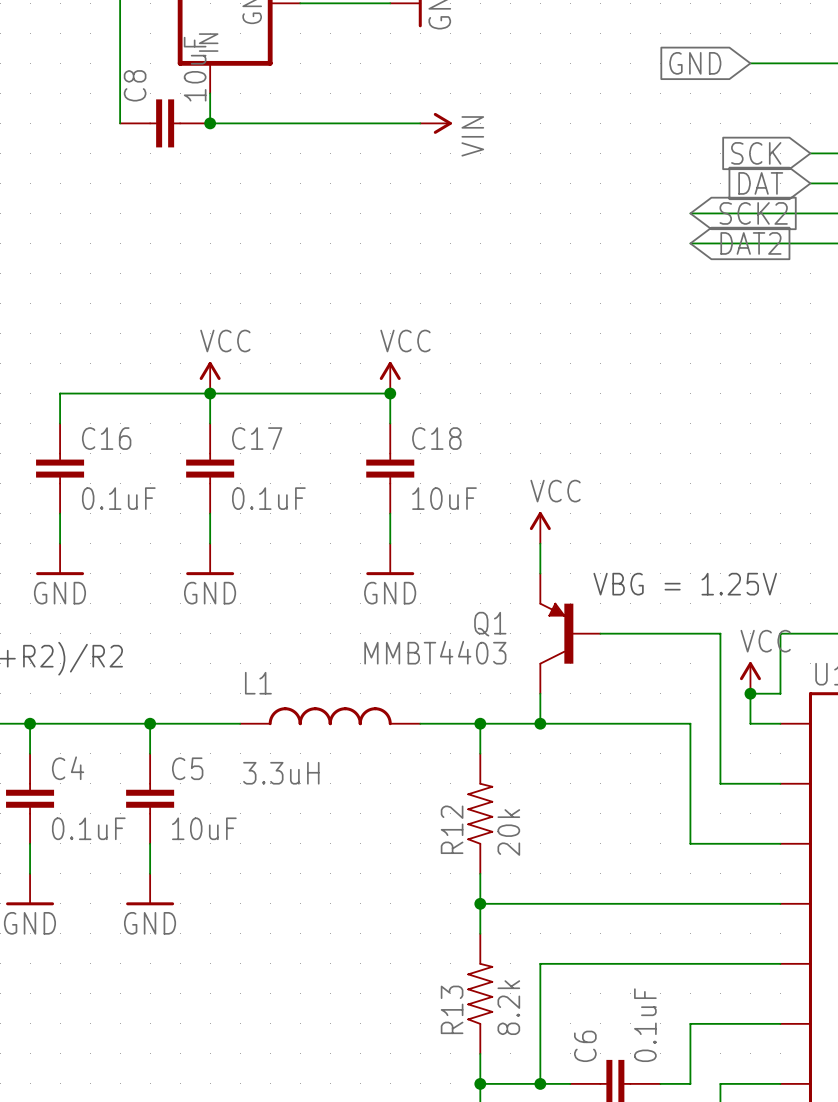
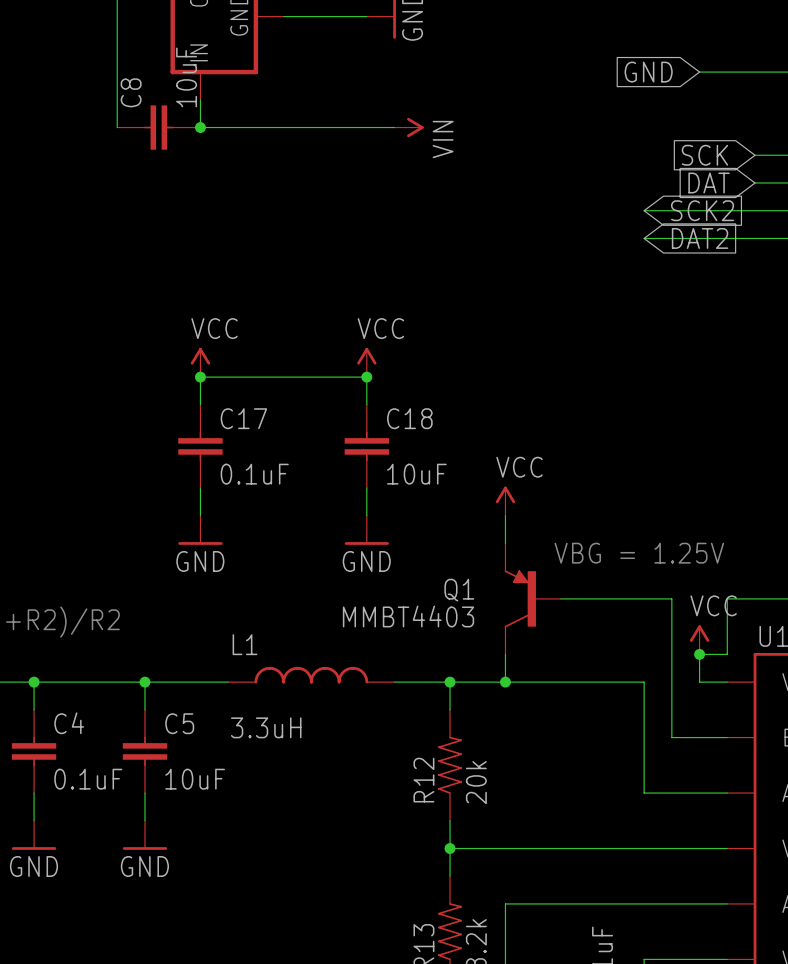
wire: (210, 393) (60, 393) (60, 423) -> none
C16: 0.1uF (60, 468) -> none
wire: (60, 513) (60, 543) -> none
power symbol: GND (60, 559) -> none

